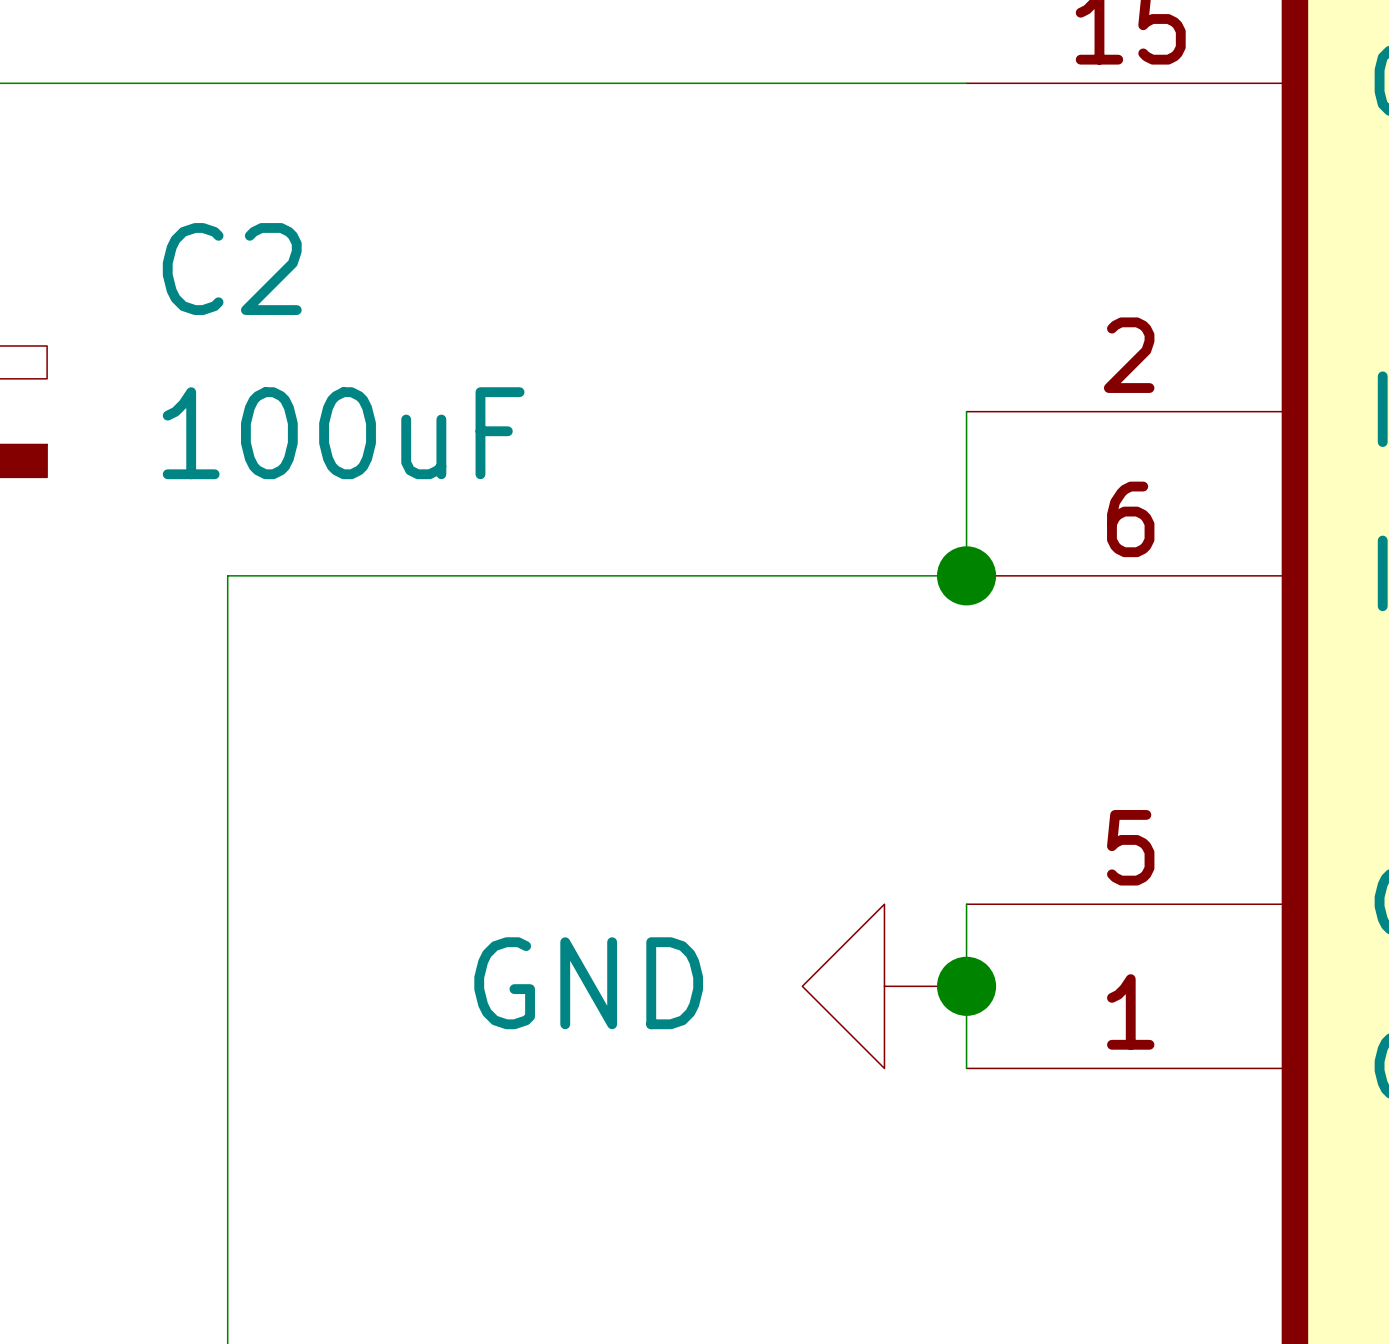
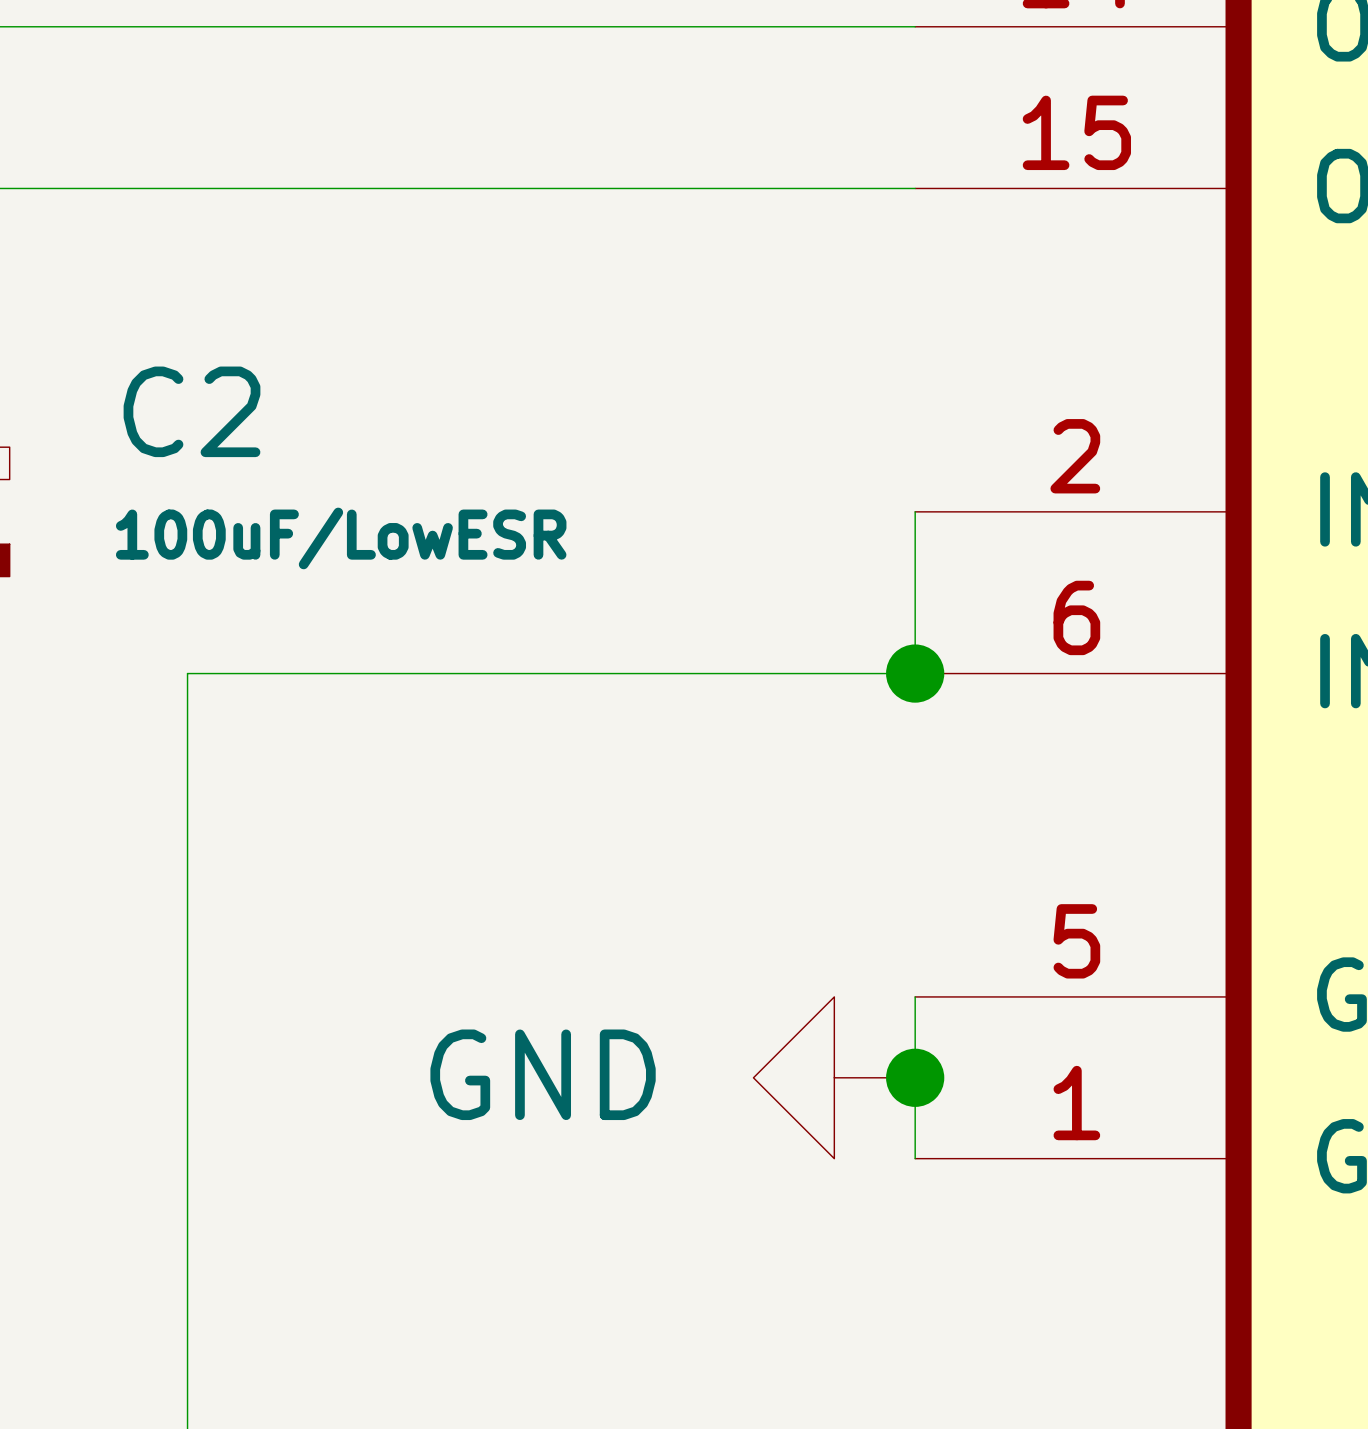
C2 name position: C2 (232, 269) -> C2 (192, 411)
C2 value: 100uF (343, 433) -> 100uF/LowESR (341, 538)

